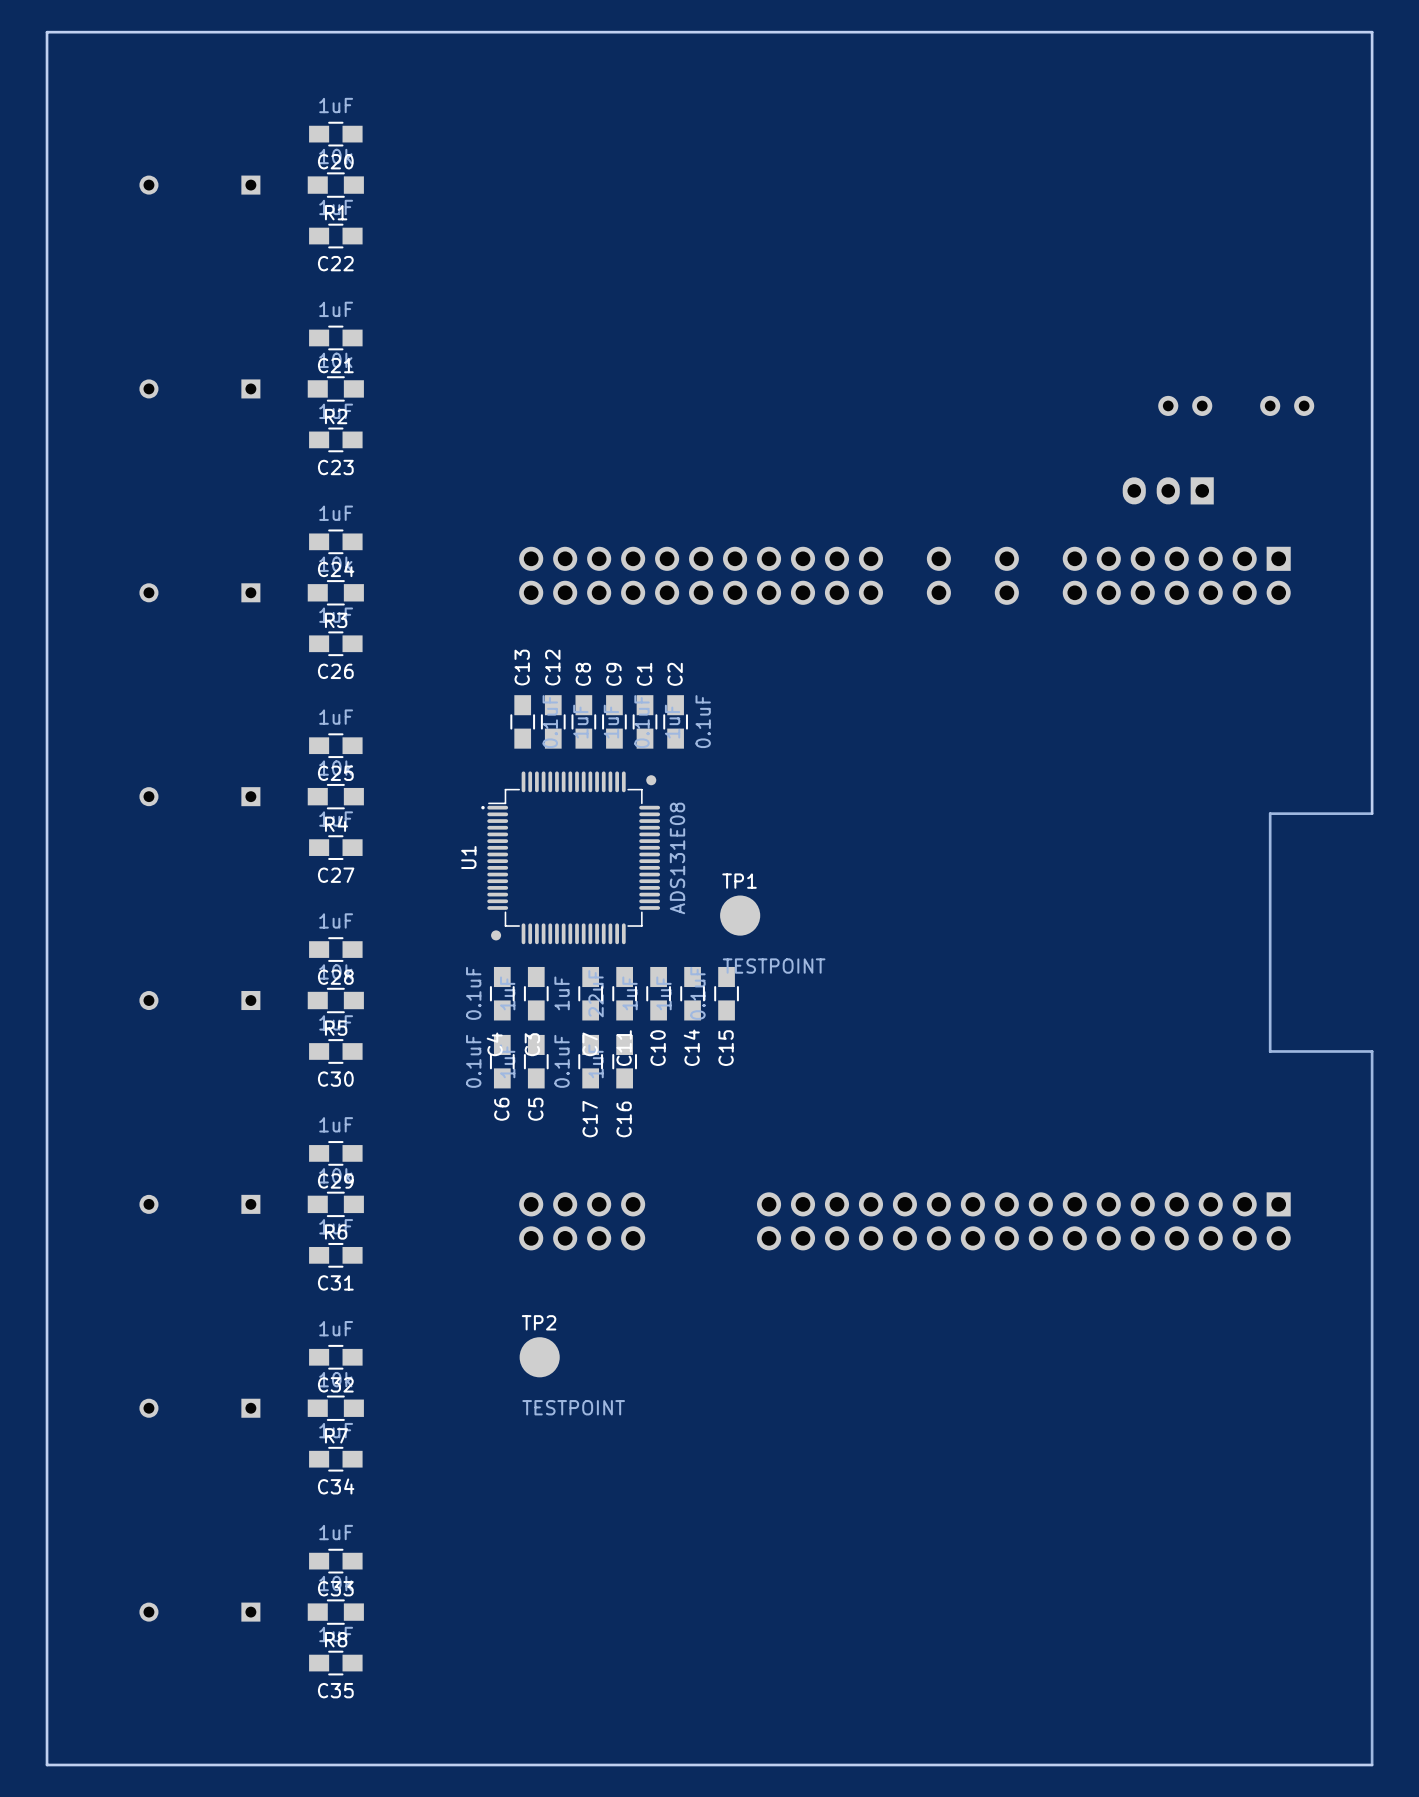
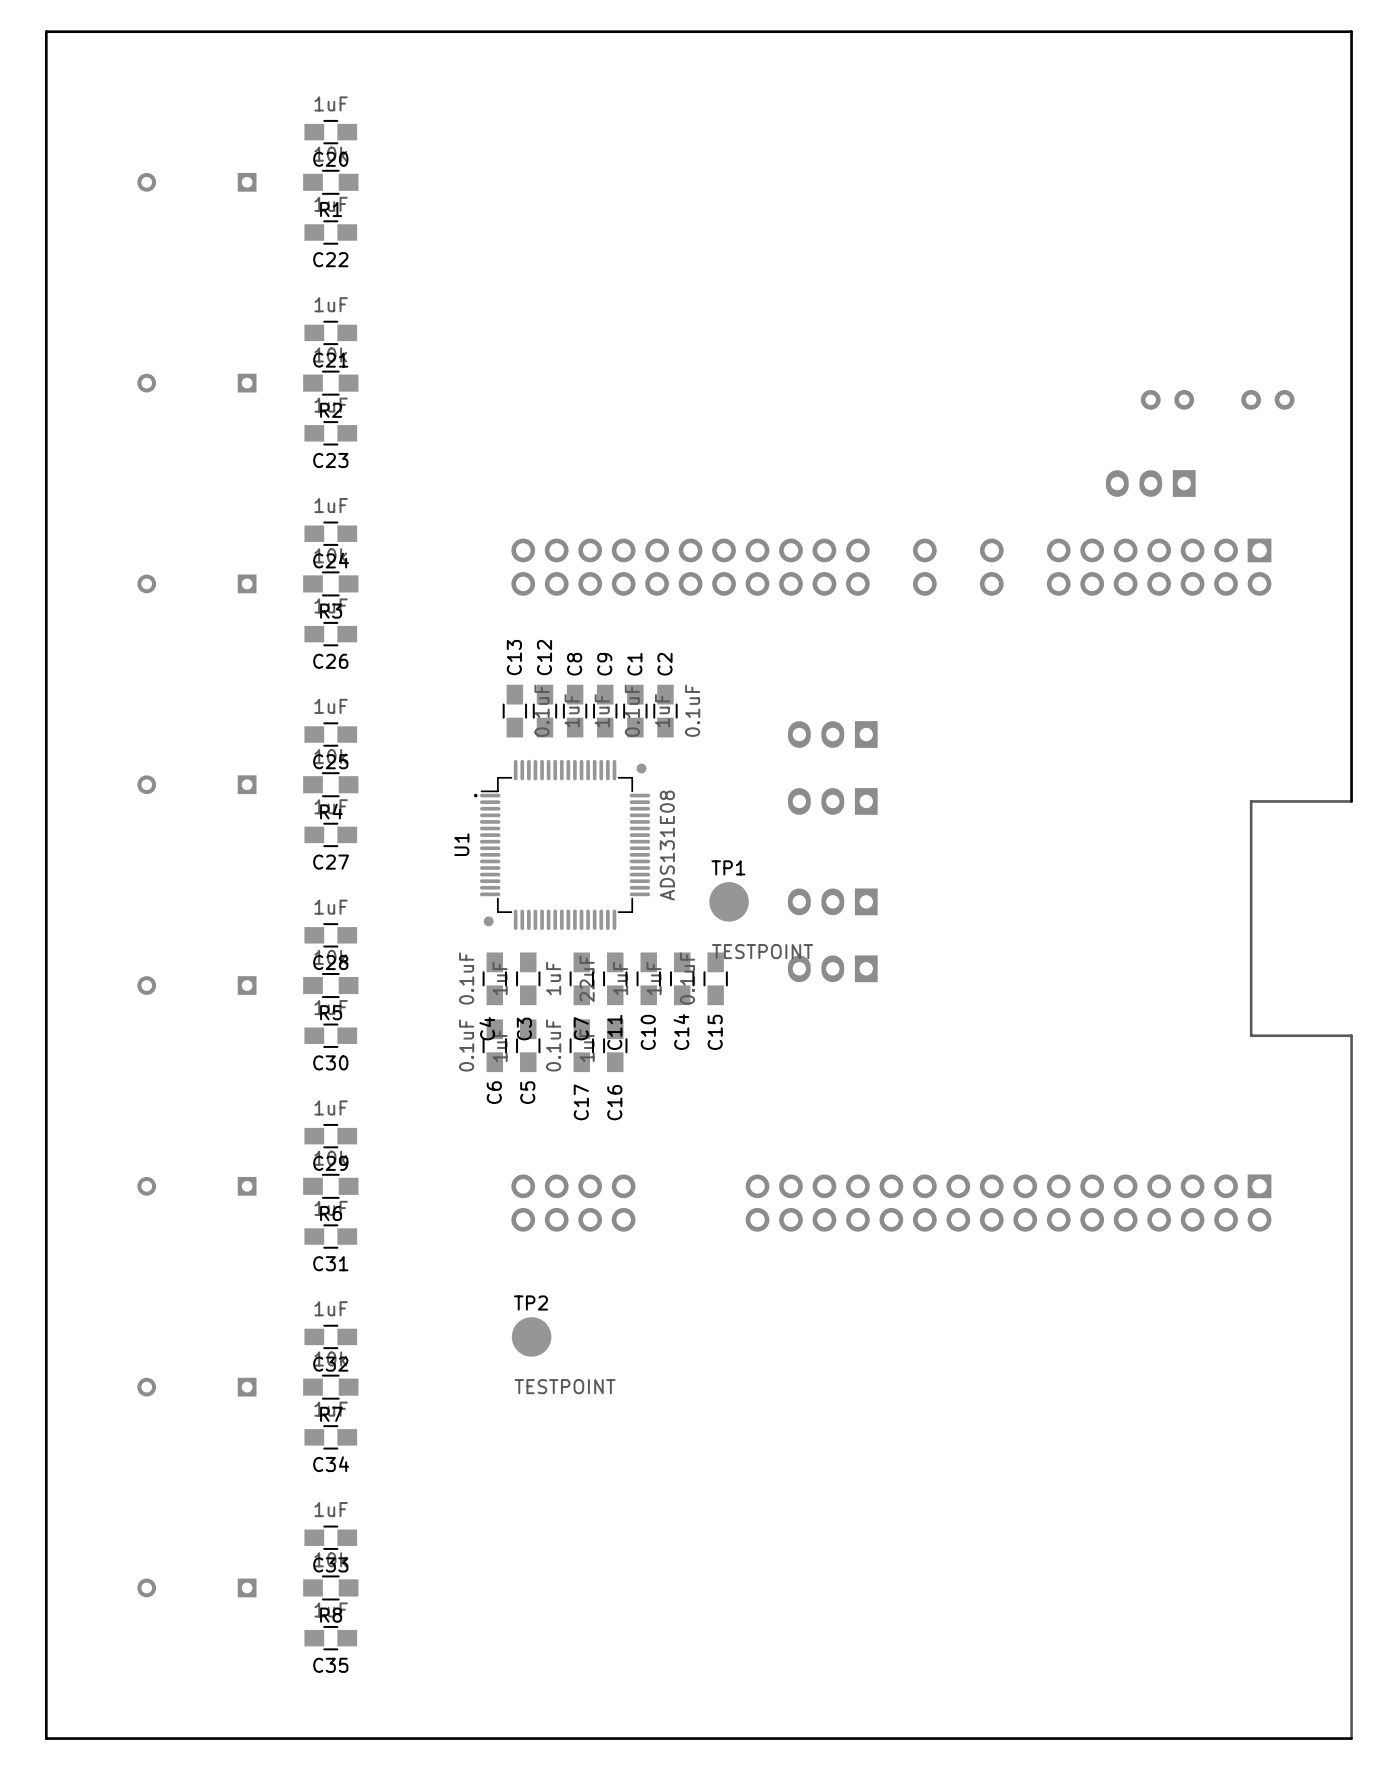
part: none -> (832, 734)
part: none -> (832, 801)
part: none -> (832, 901)
part: none -> (832, 968)

